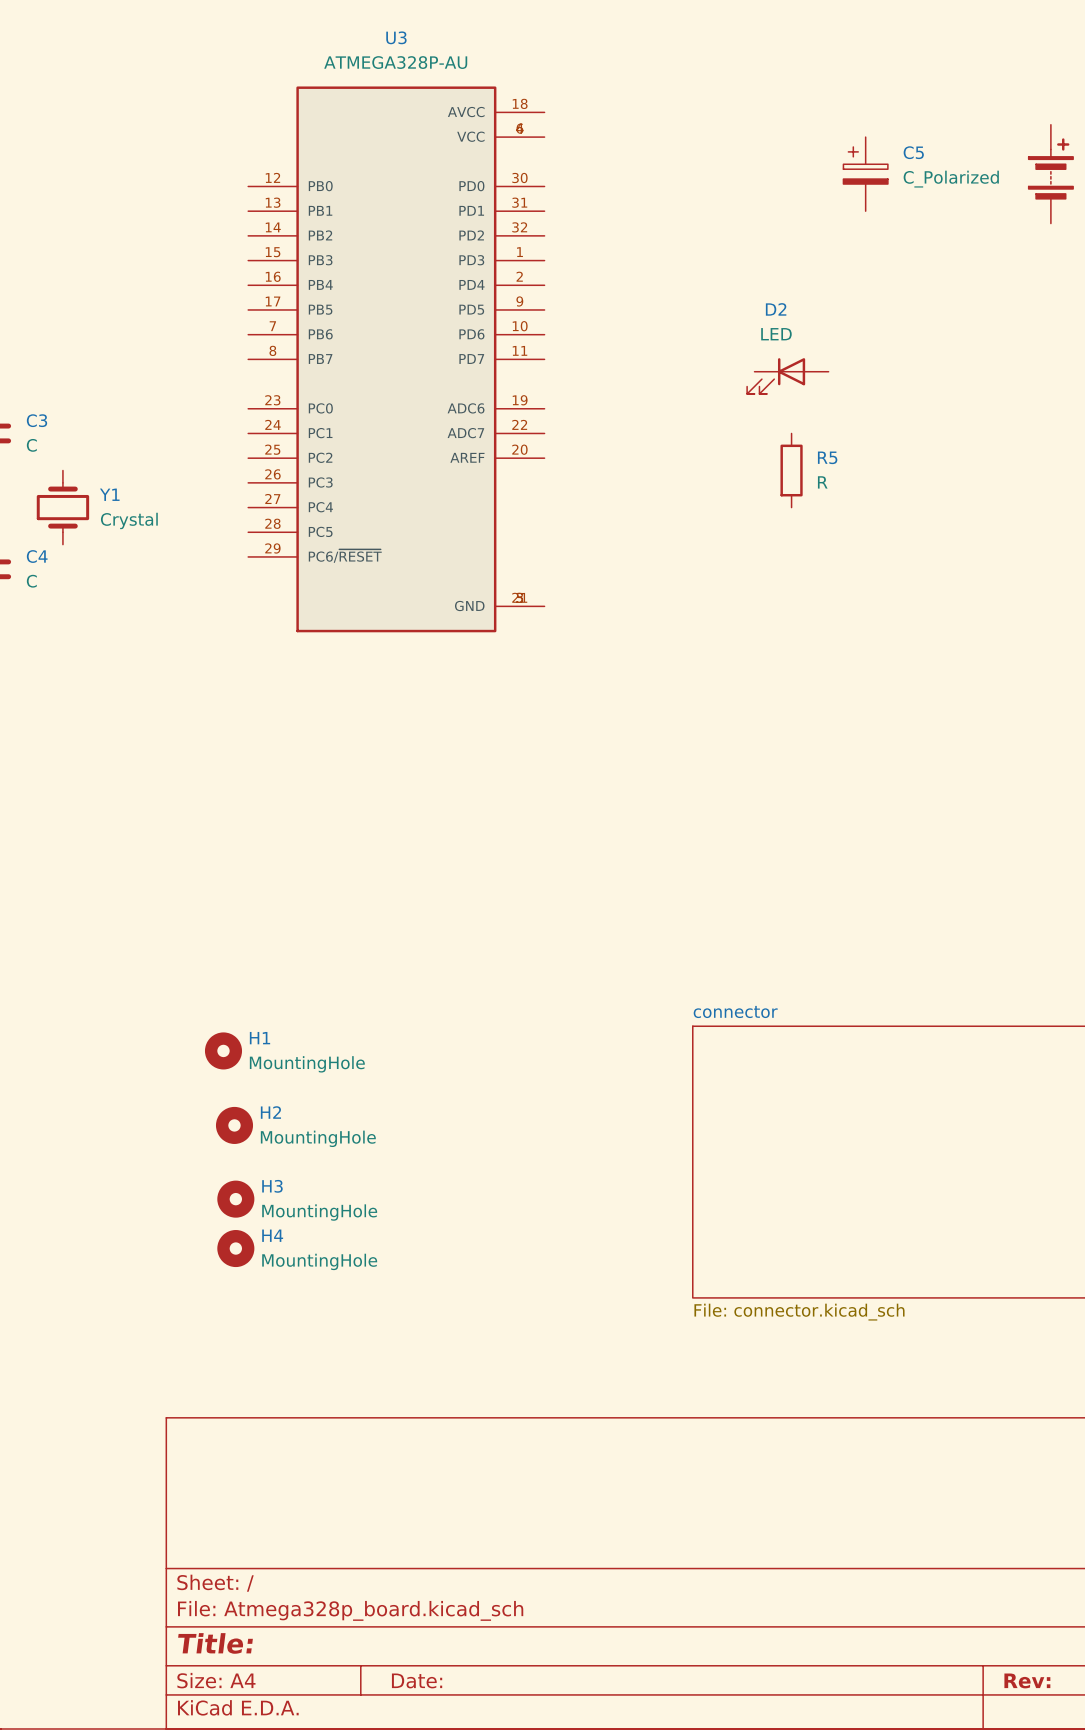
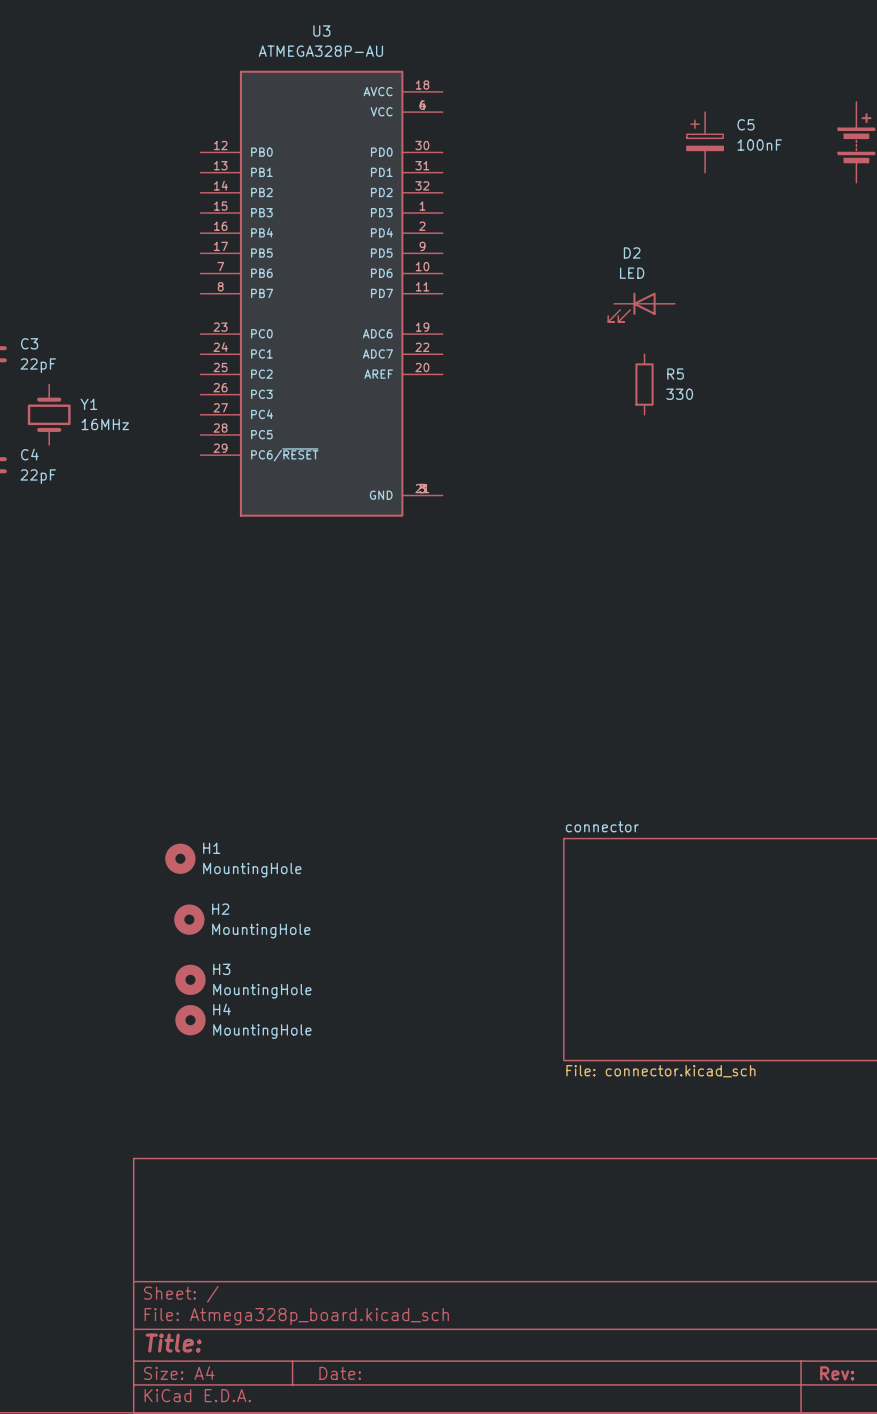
C5 value: C_Polarized (951, 179) -> 100nF (759, 145)
C3 value: C (31, 445) -> 22pF (38, 365)
R5 value: R (822, 482) -> 330 (679, 394)
Y1 value: Crystal (129, 520) -> 16MHz (105, 424)
C4 value: C (31, 581) -> 22pF (38, 476)

